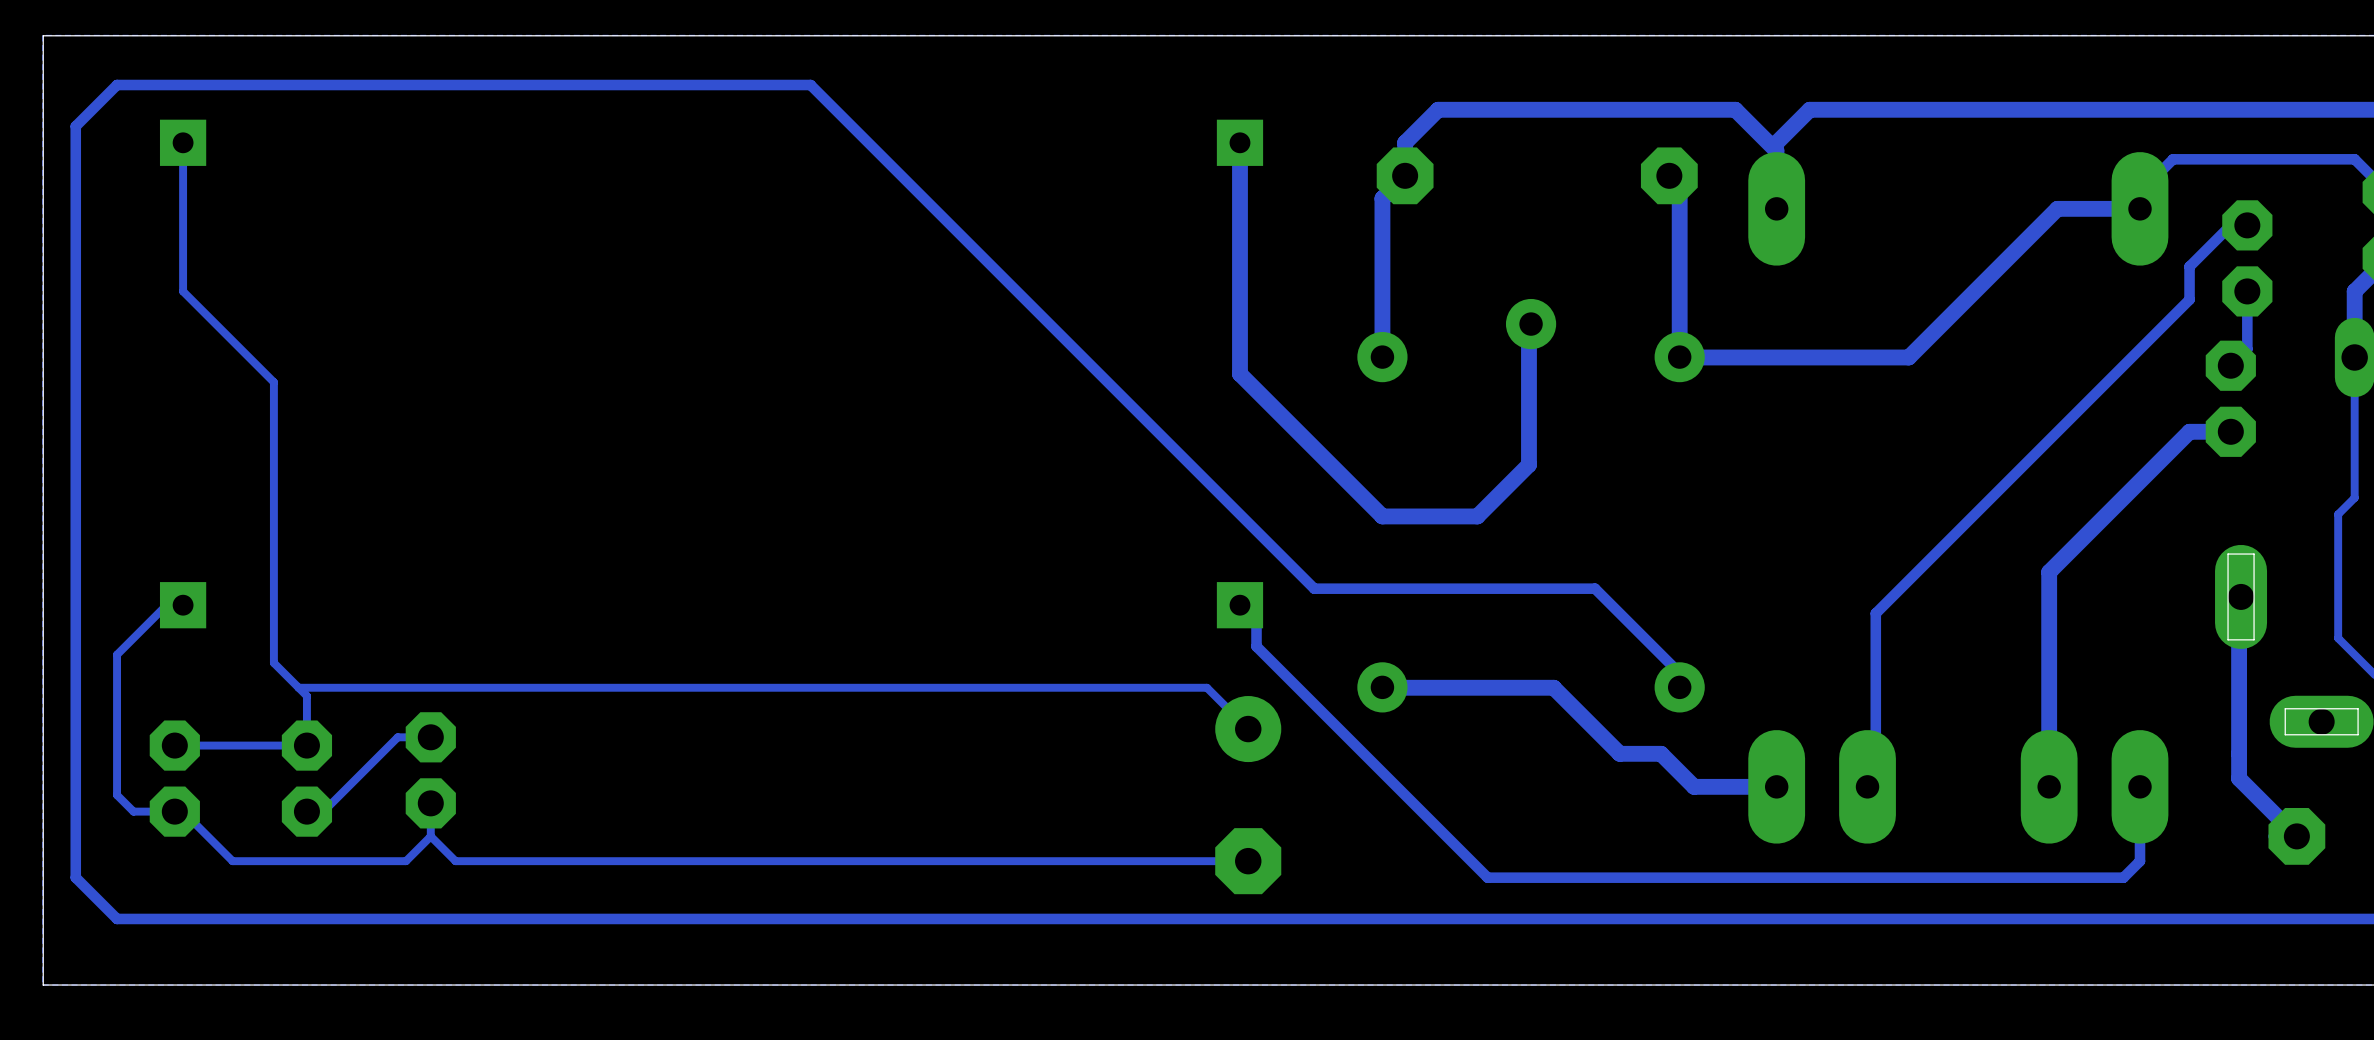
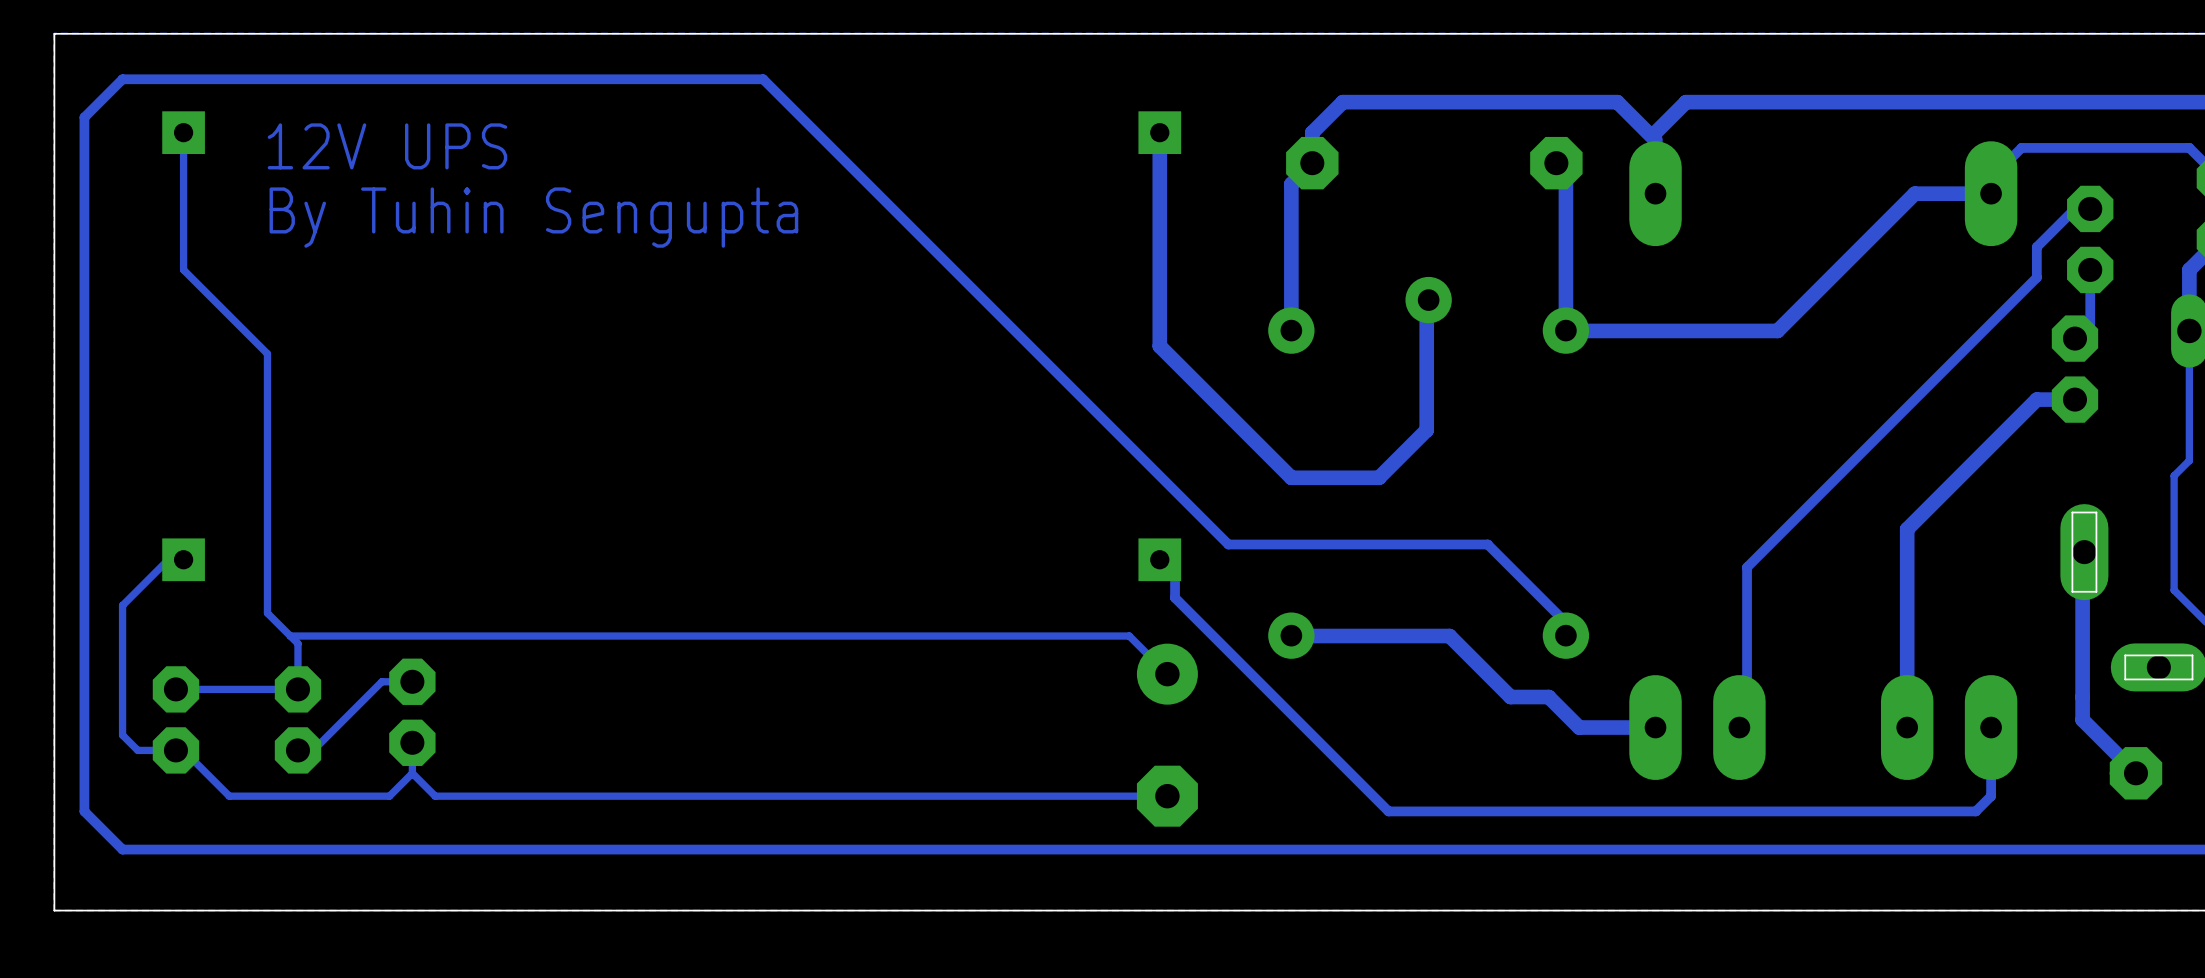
text: none -> 12V UPS (387, 146)
text: none -> By Tuhin Sengupta (533, 217)

